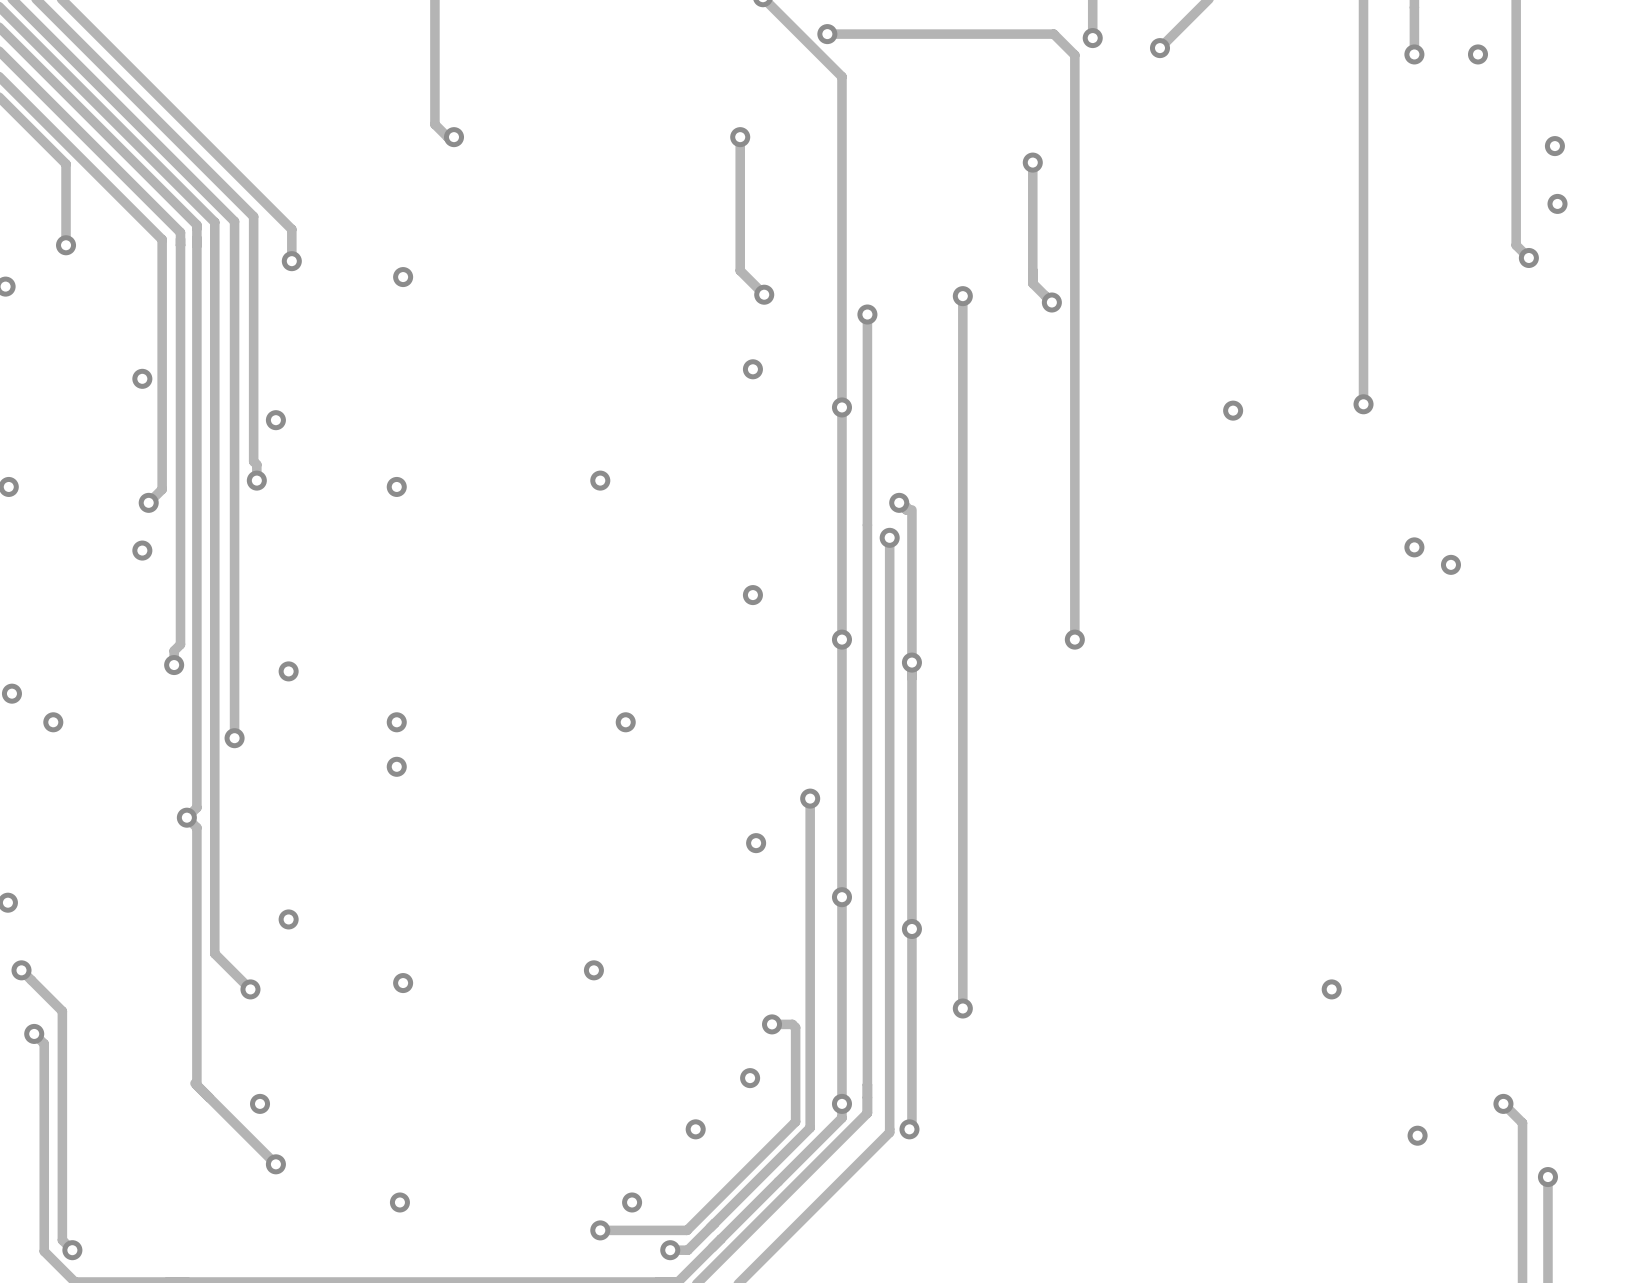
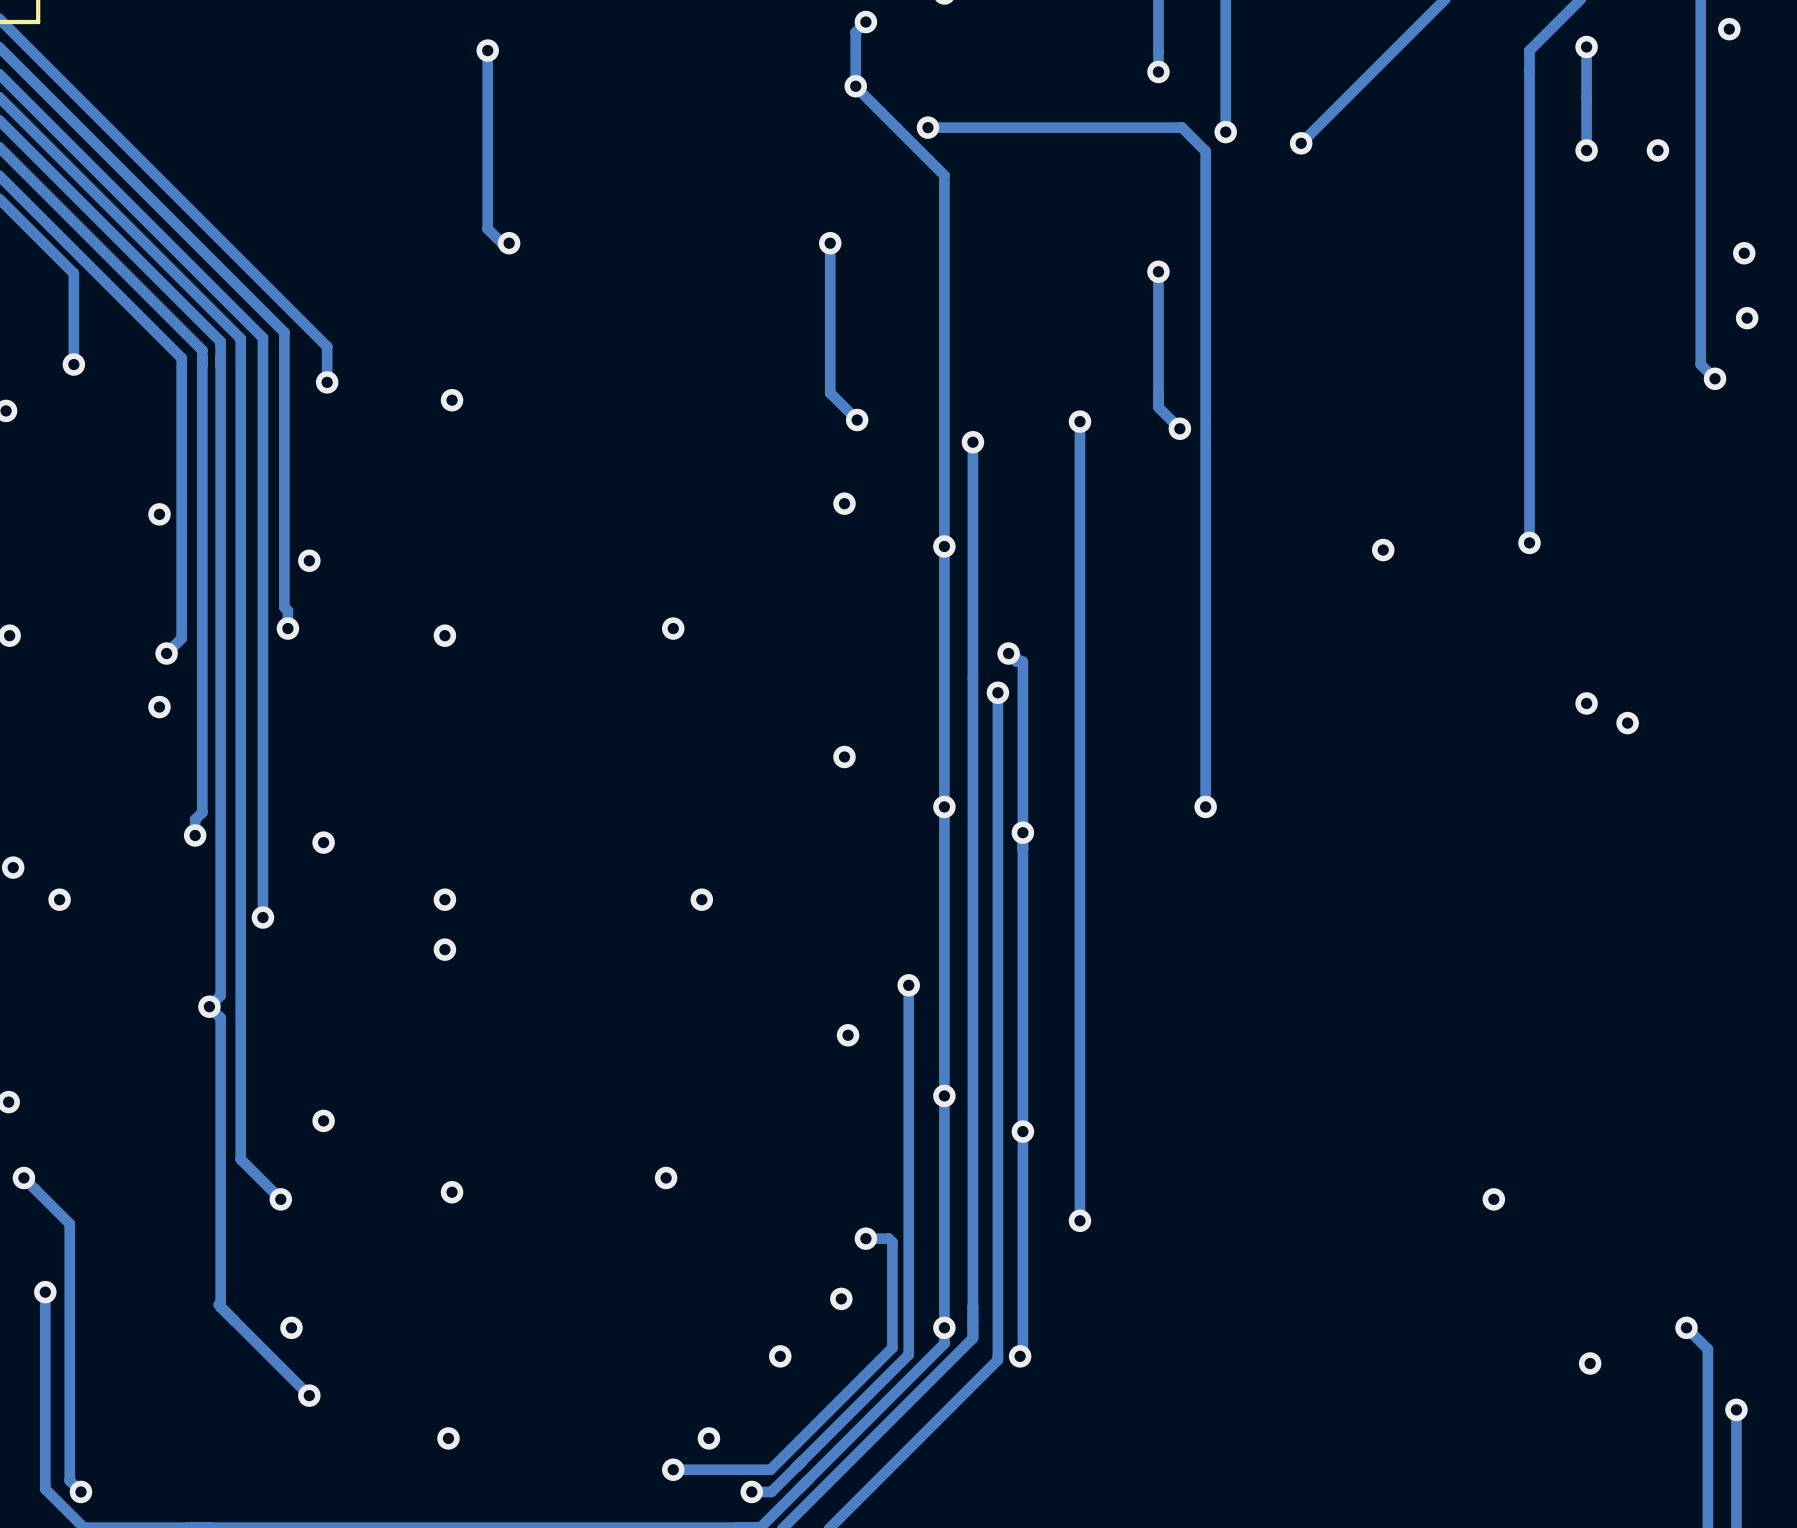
track: (34, 1033) (44, 1043) (44, 1251) -> (45, 1292) (45, 1489) (49, 1493)
via position: (34, 1033) -> (45, 1292)

